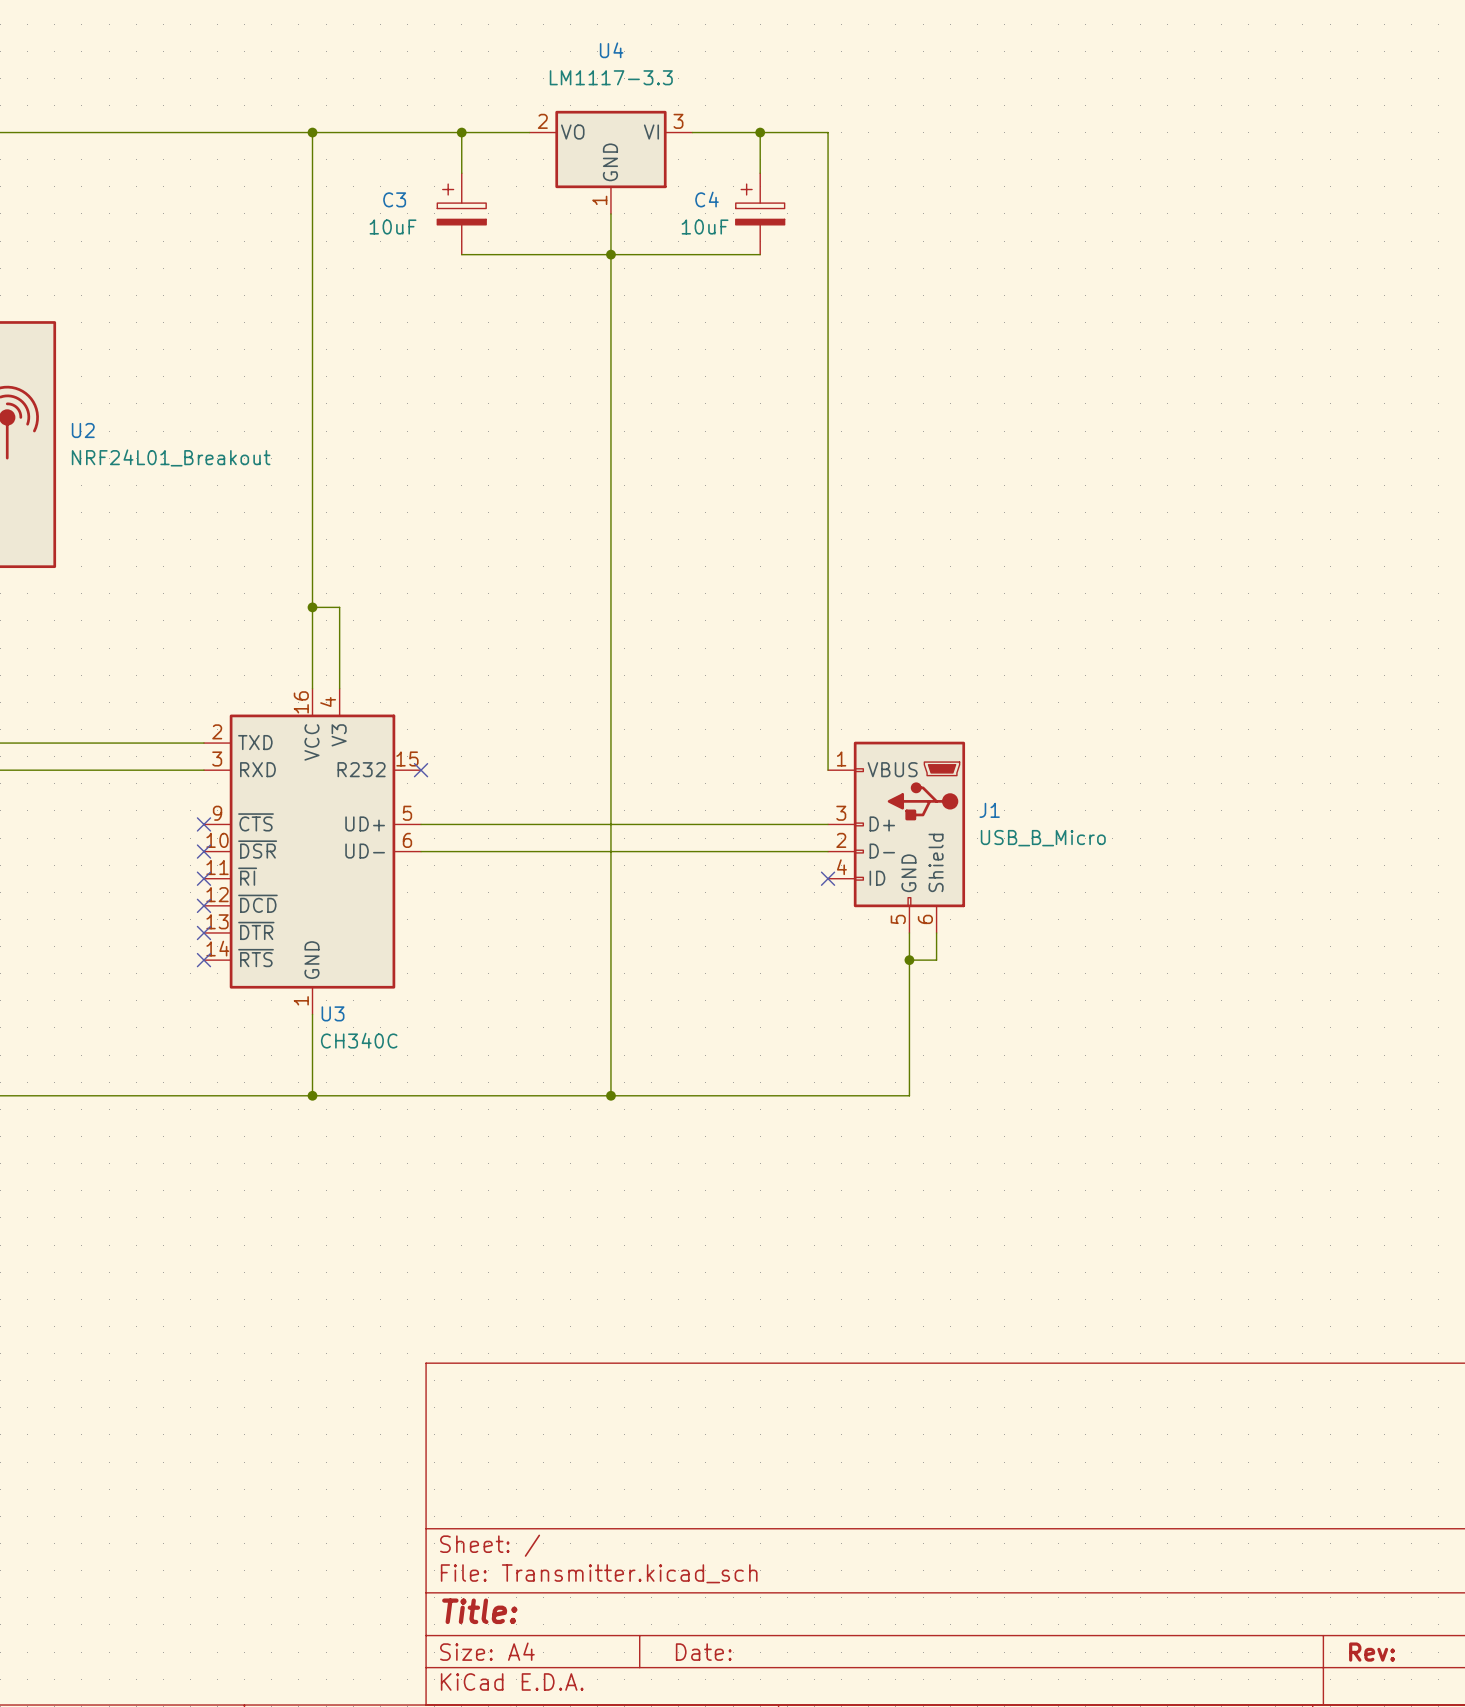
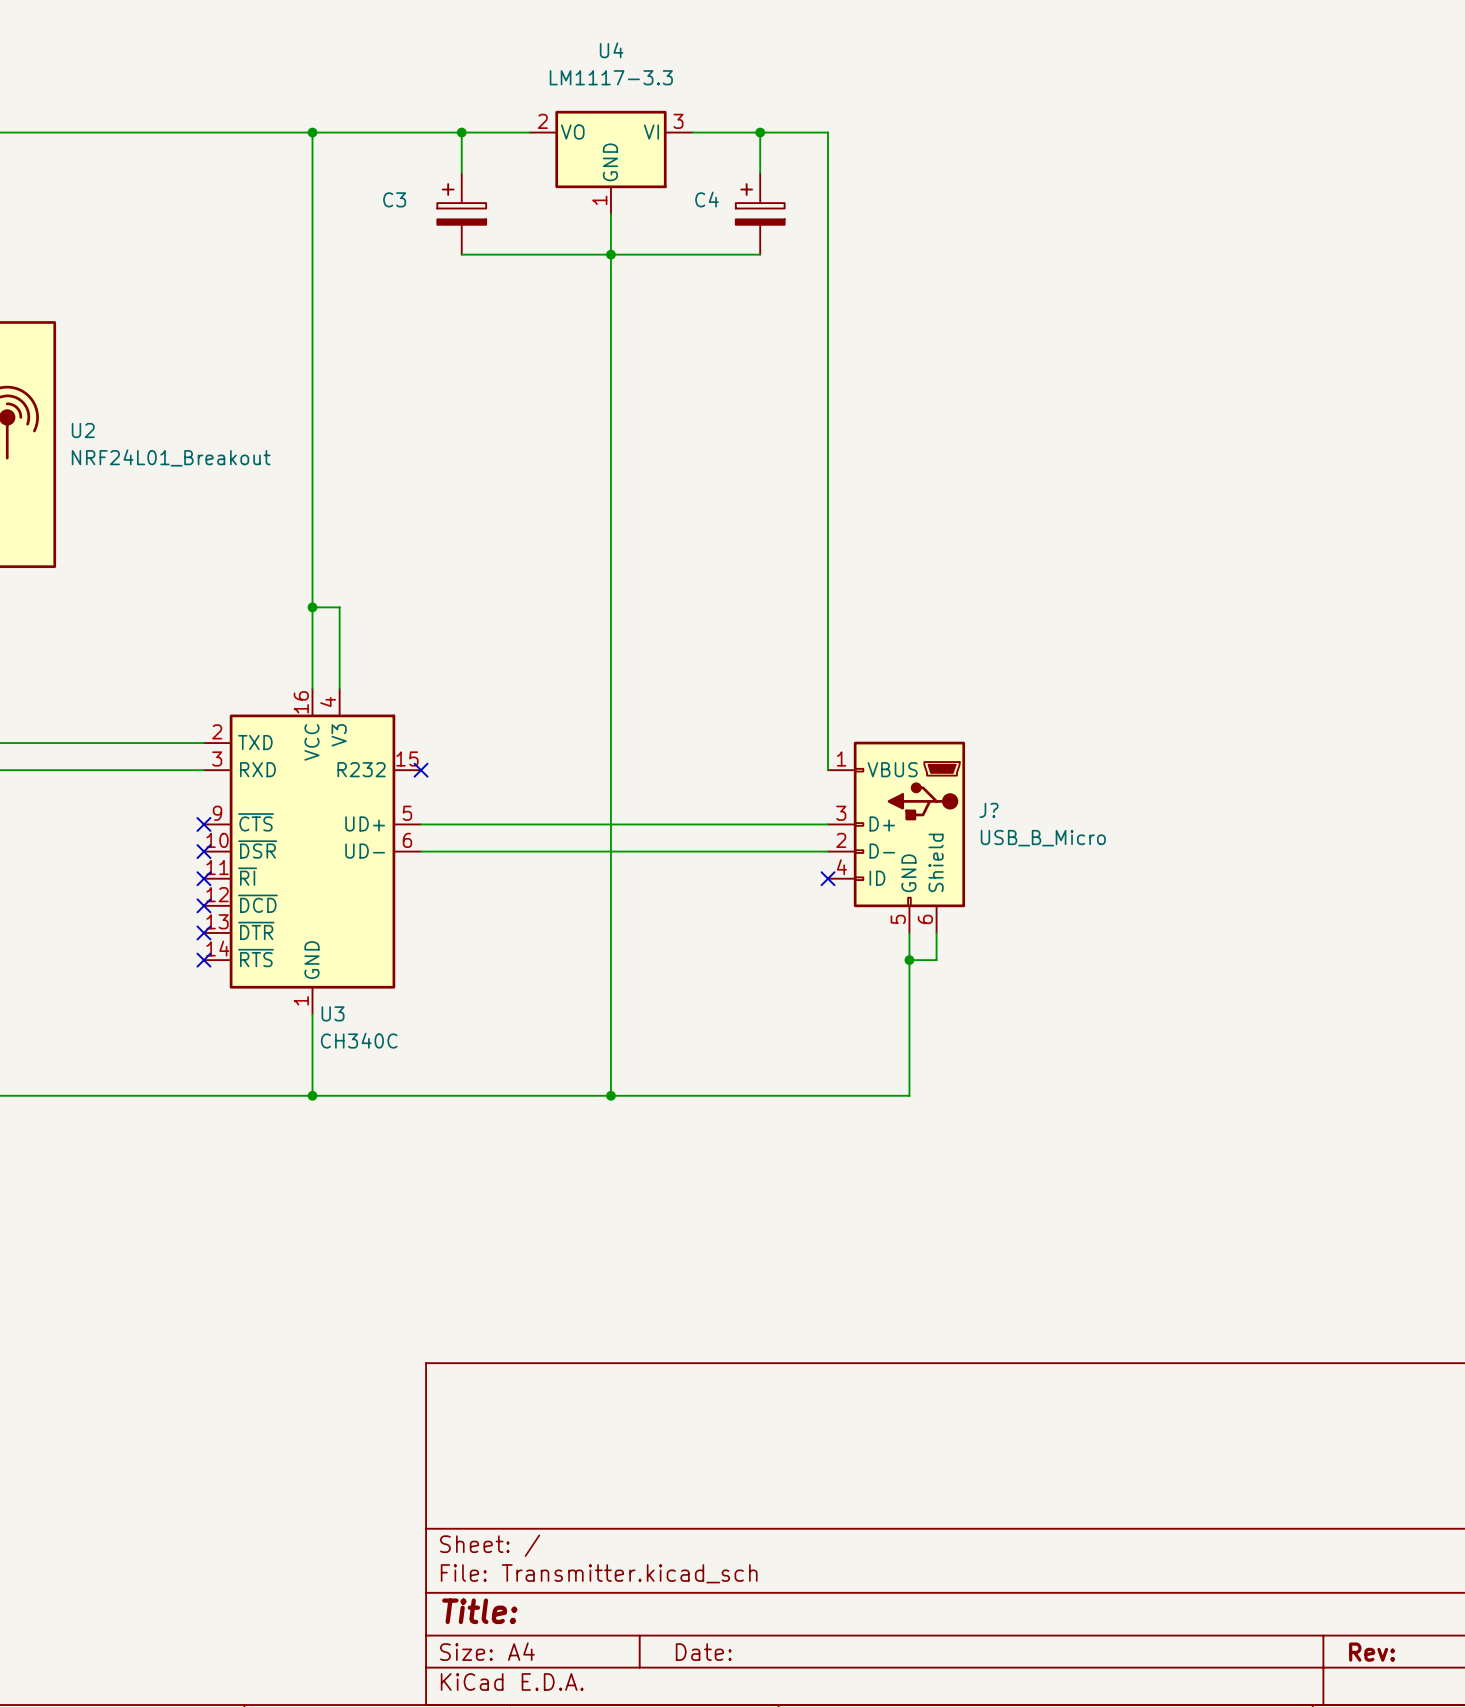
C3 value: 10uF (393, 227) -> none
C4 value: 10uF (705, 227) -> none
J1 name: J1 (989, 810) -> J? (989, 810)

